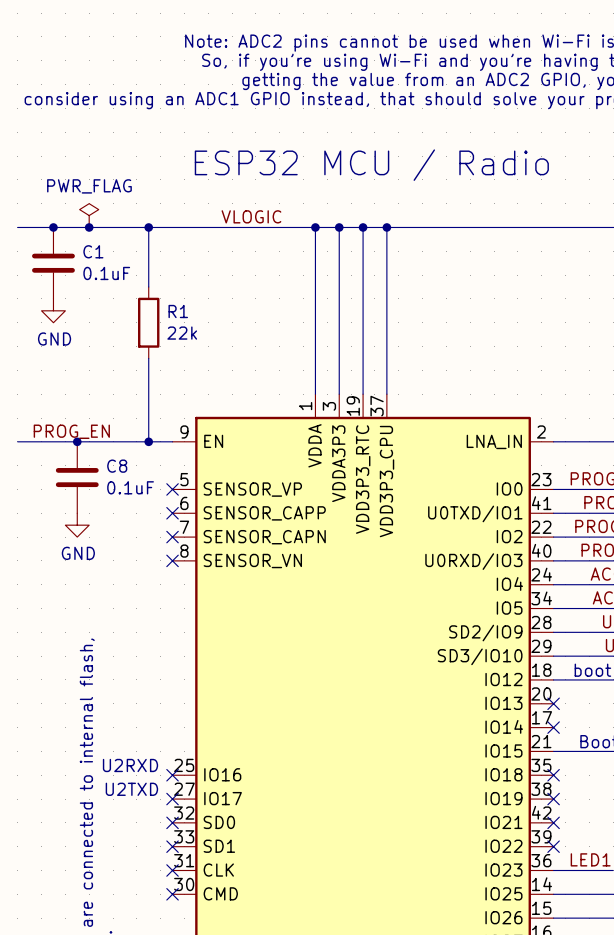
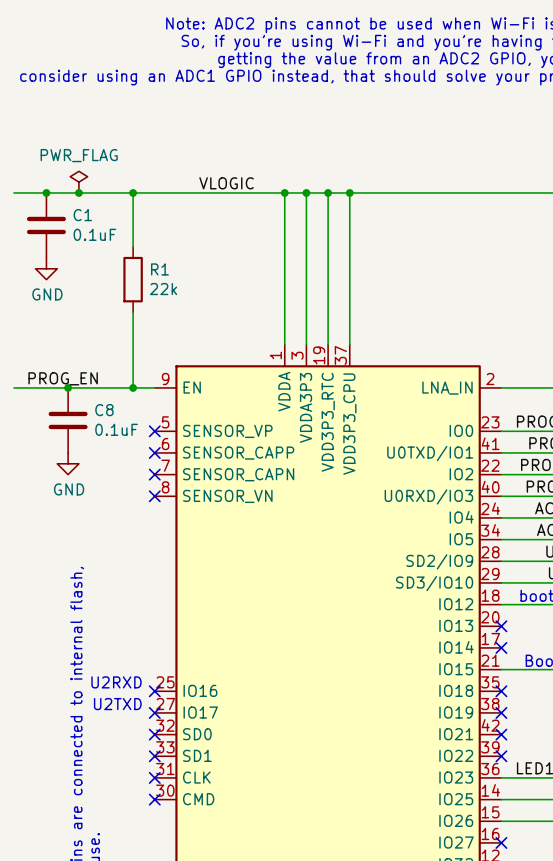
text: ESP32 MCU / Radio (371, 165) -> none

